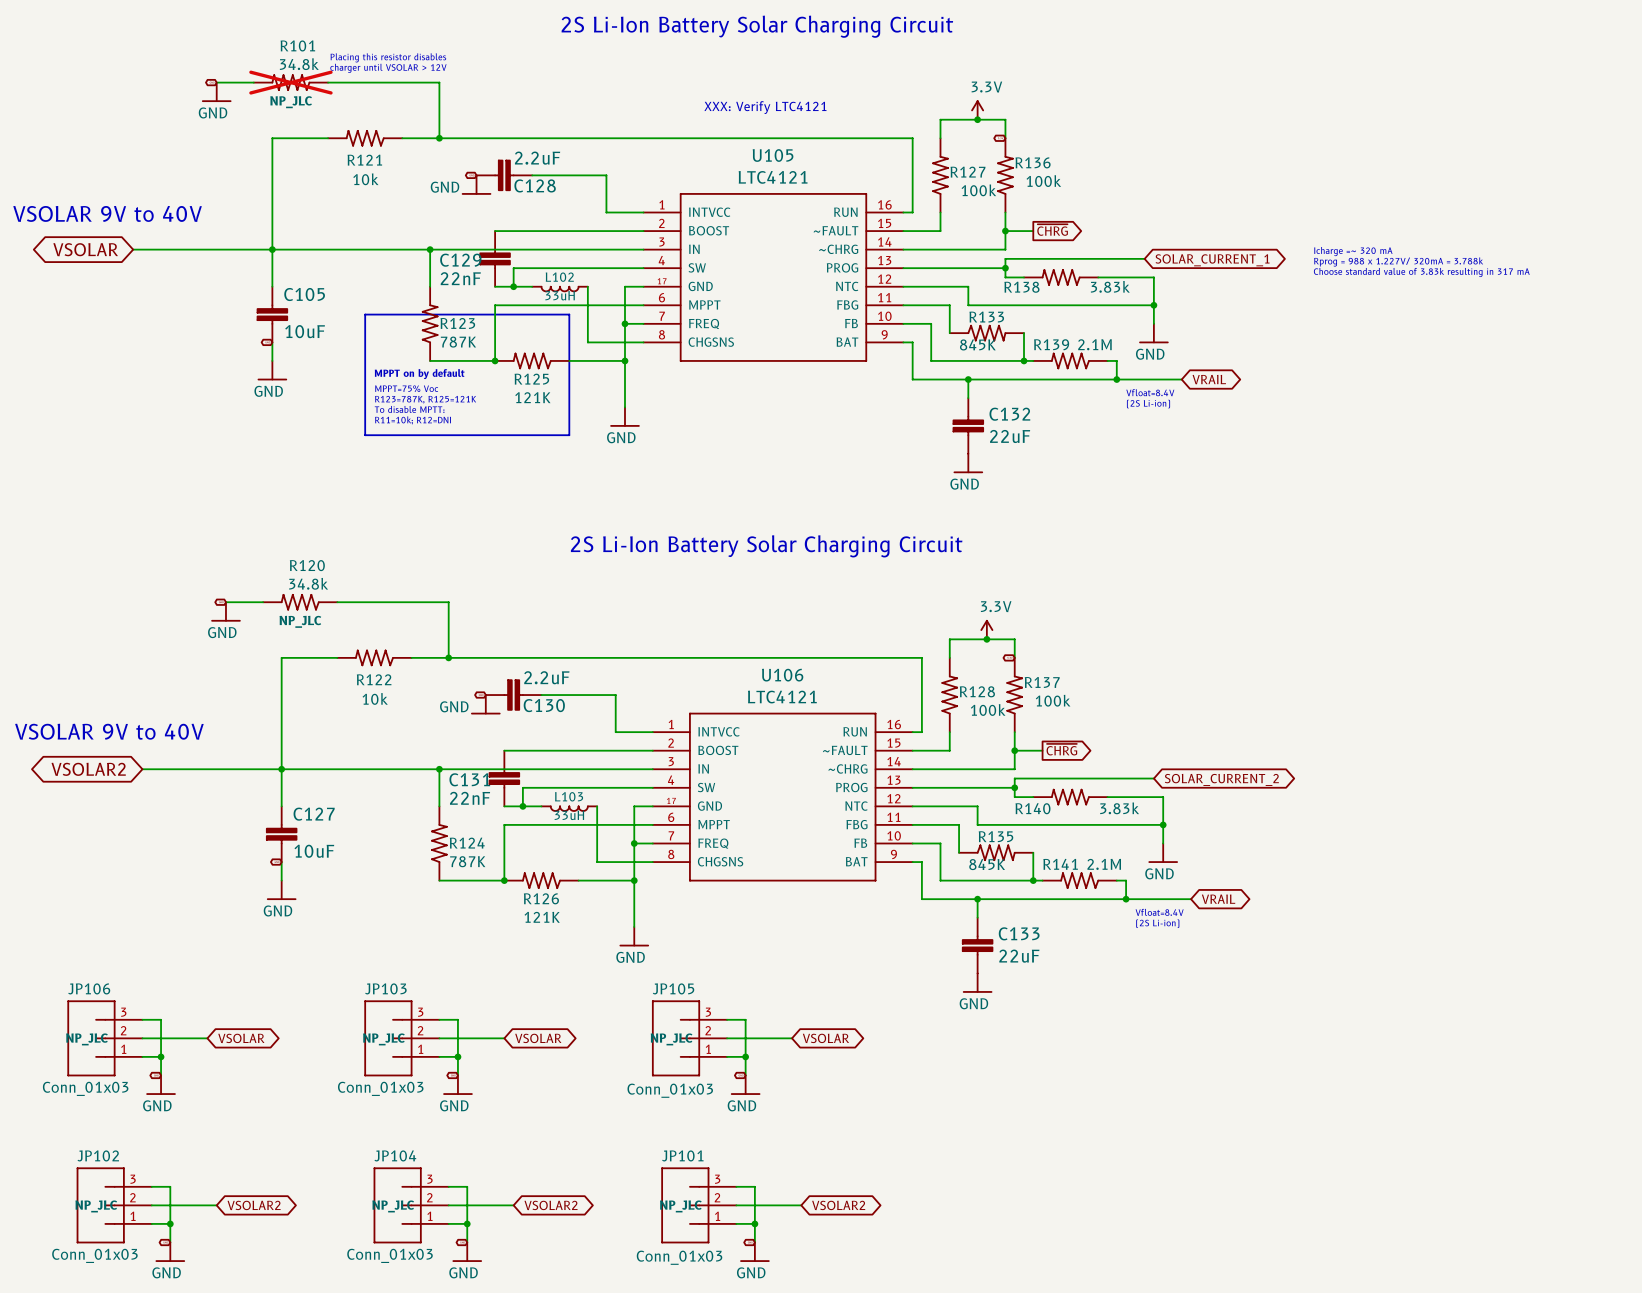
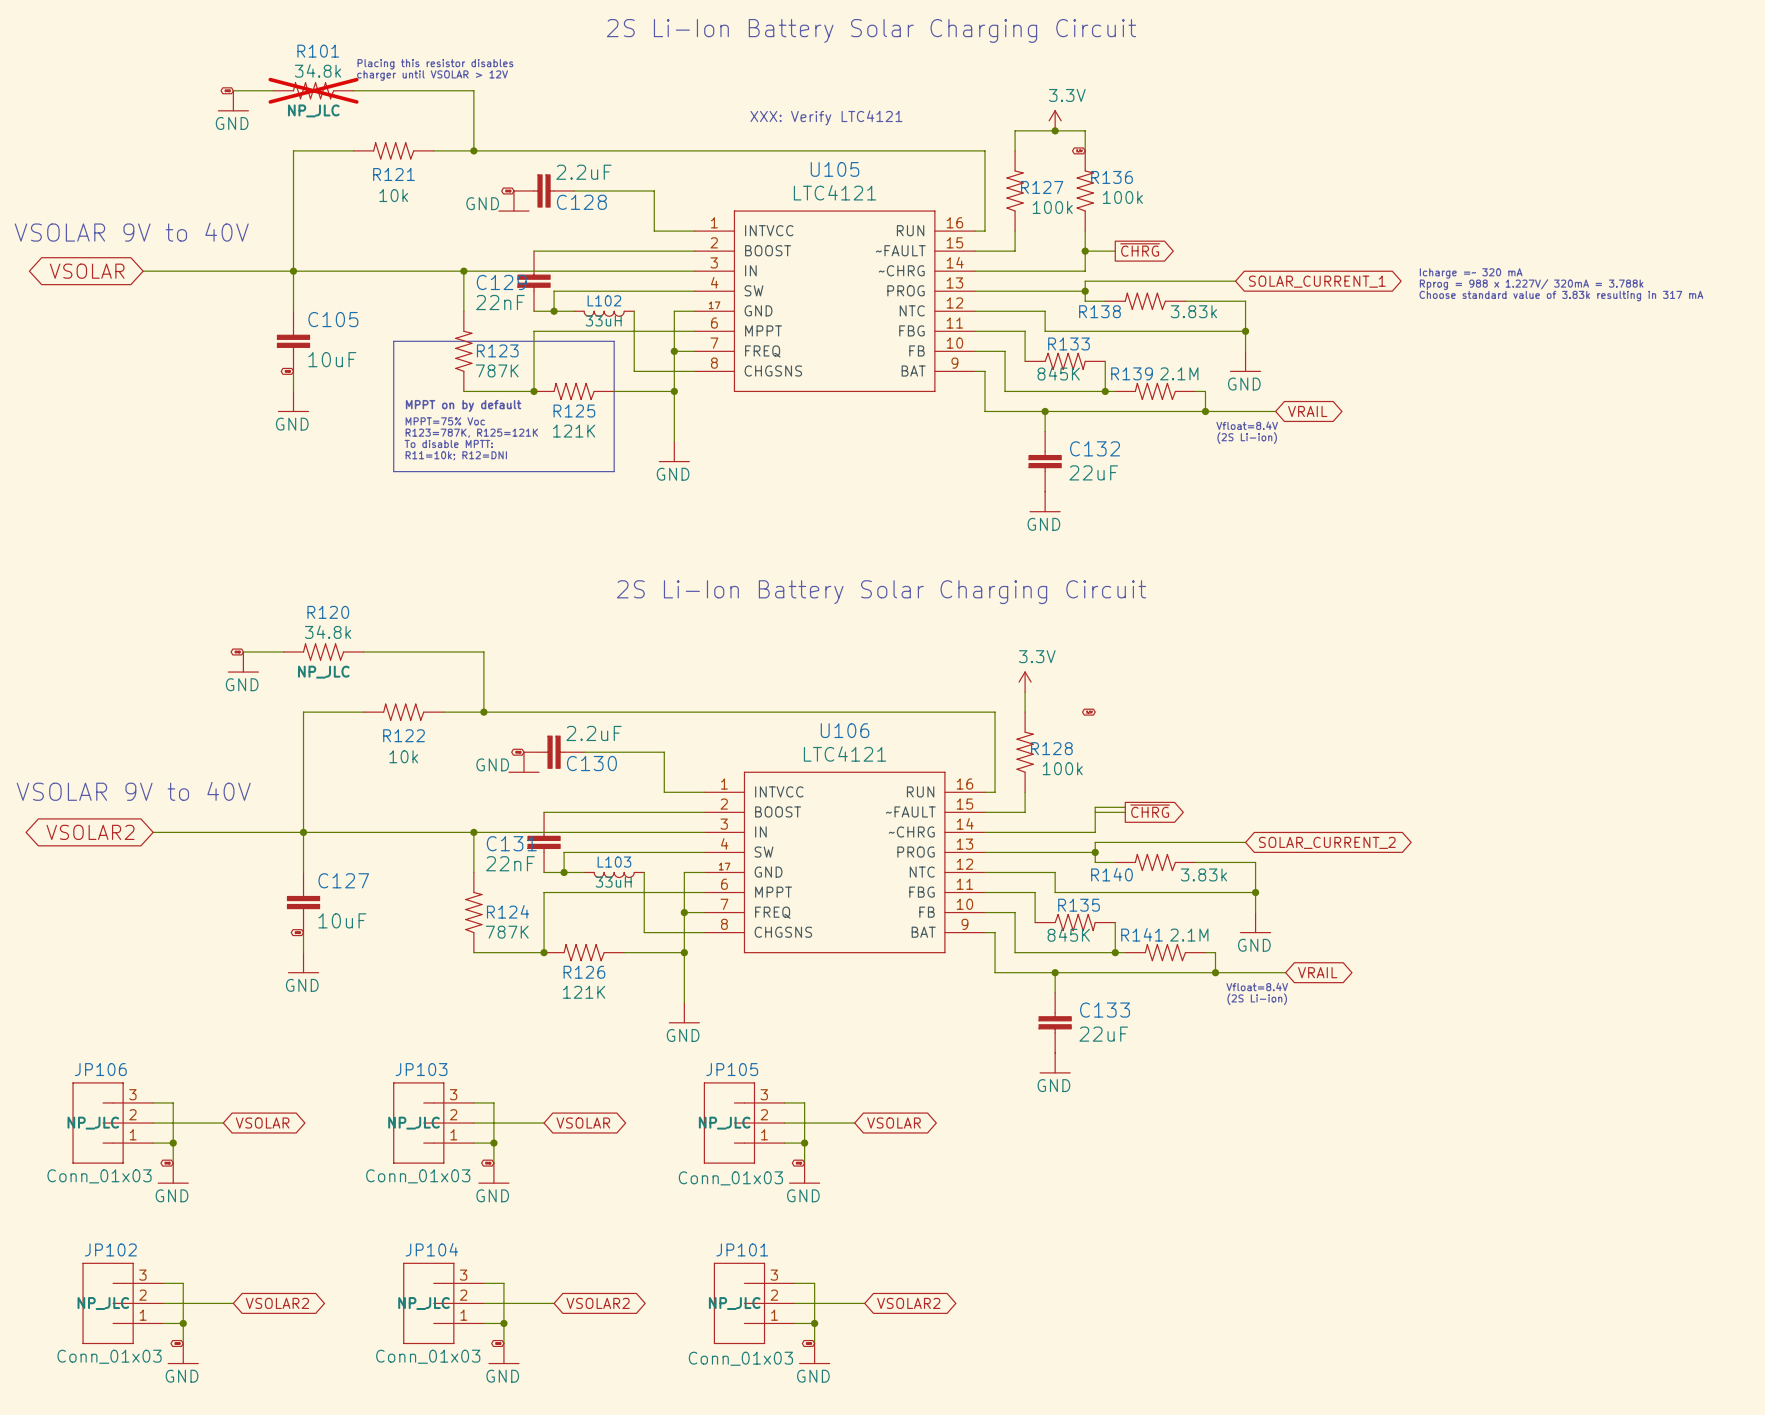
power symbol position: 3.3V (986, 630) -> 3.3V (1025, 682)
wire: (949, 639) (1014, 639) (1014, 657) -> none
junction: (986, 639) -> none
R137: 100k (1014, 695) -> none
wire: (1014, 732) (1014, 746) -> (1125, 807) (1095, 807)
junction: (1014, 750) -> none

